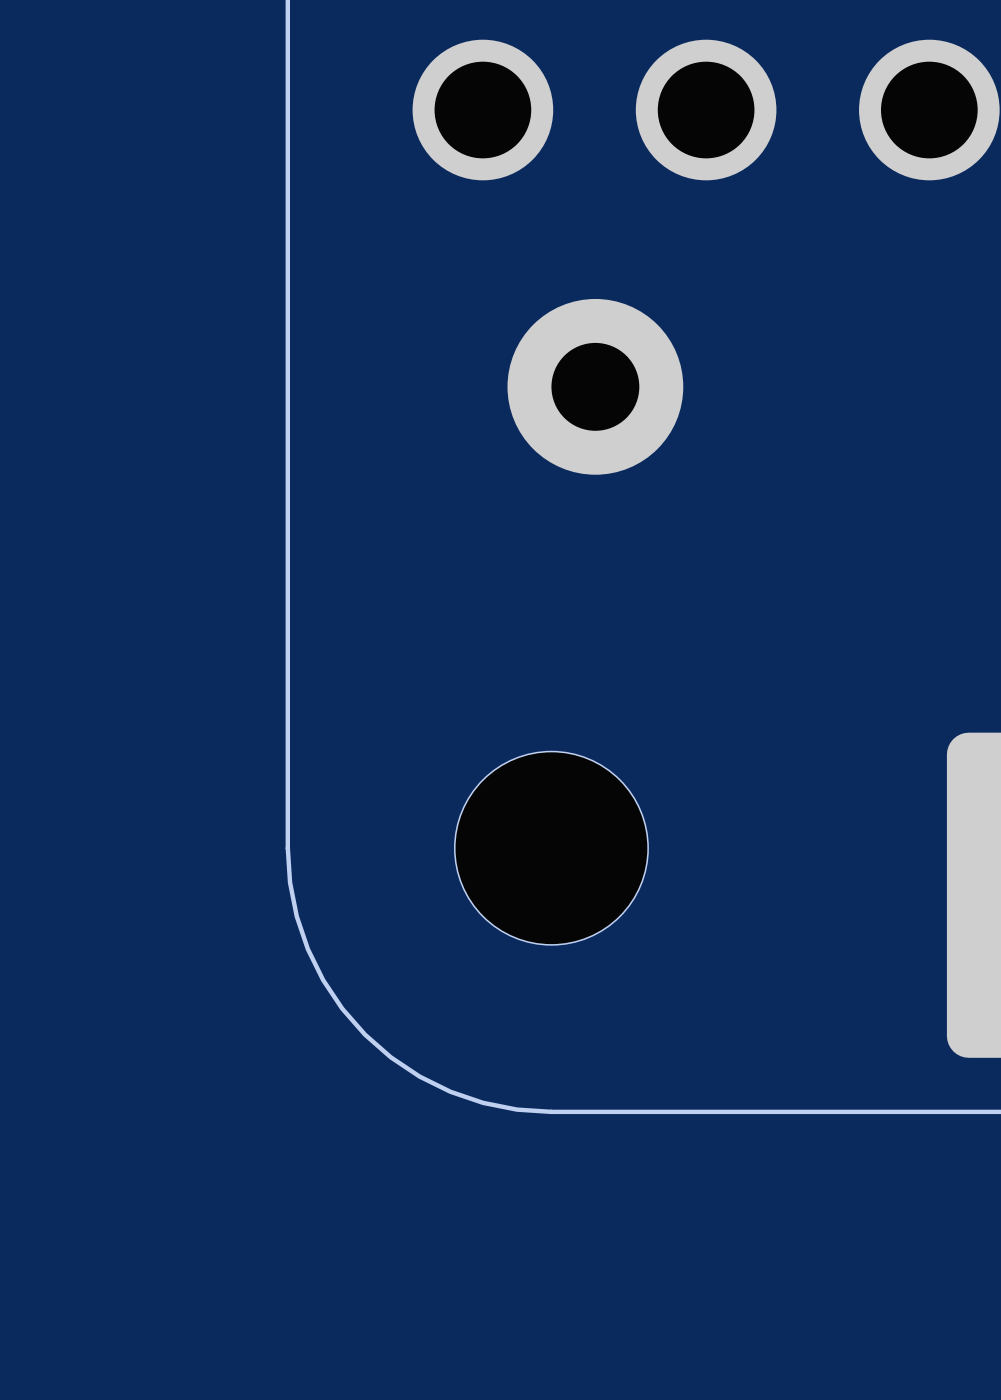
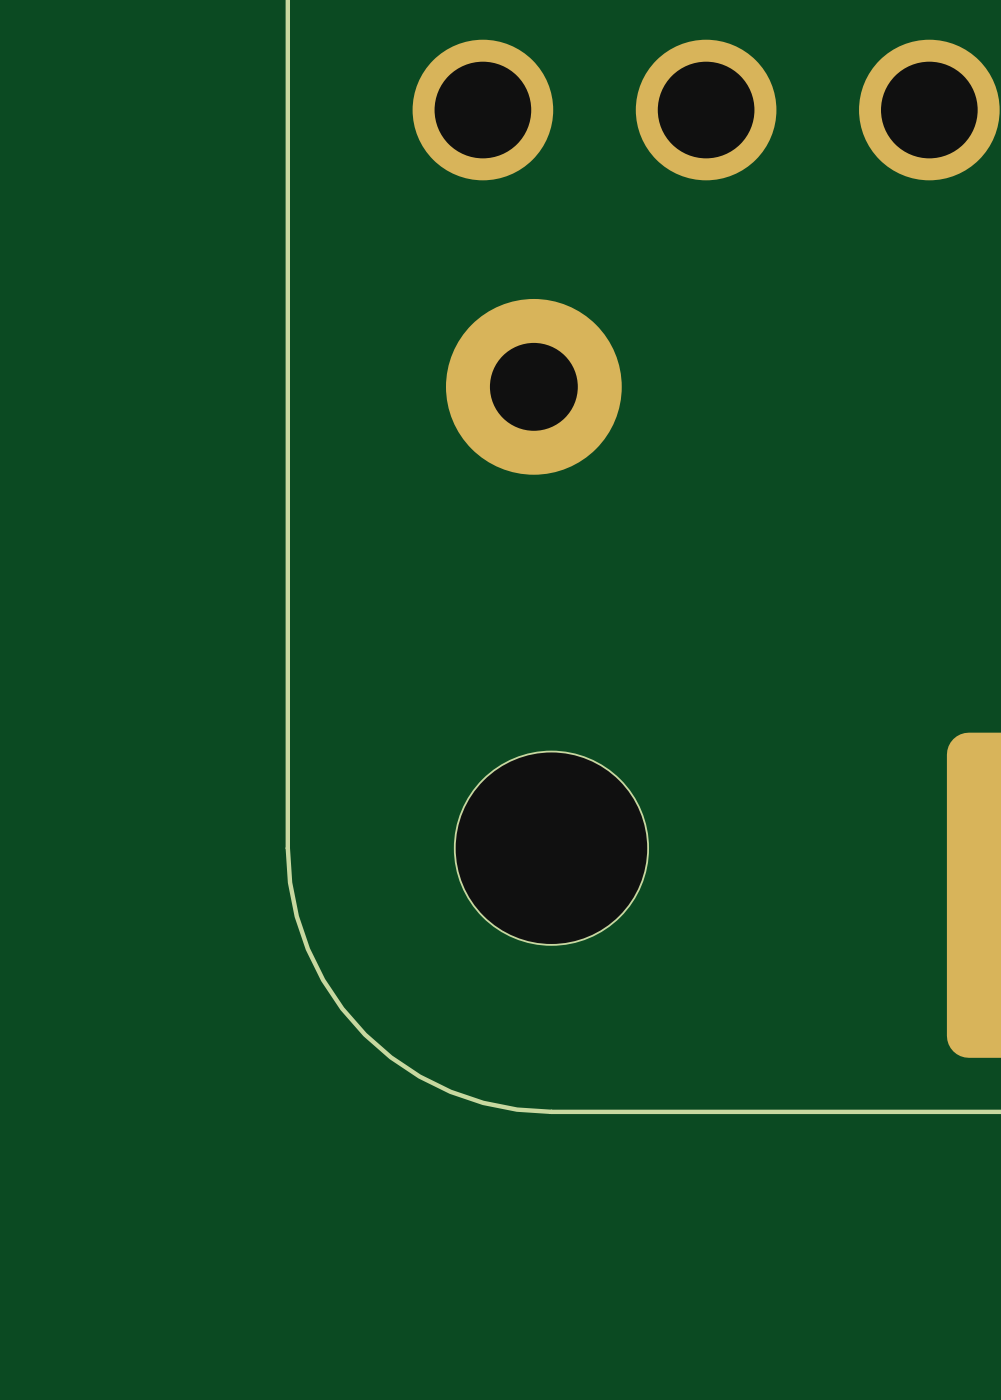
part position: (595, 386) -> (533, 386)

